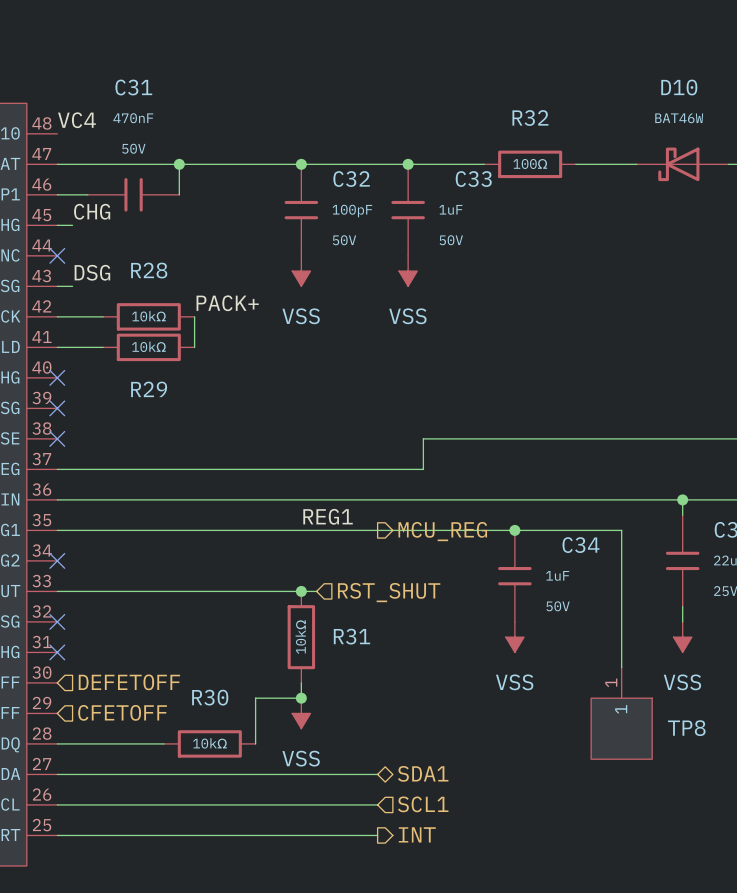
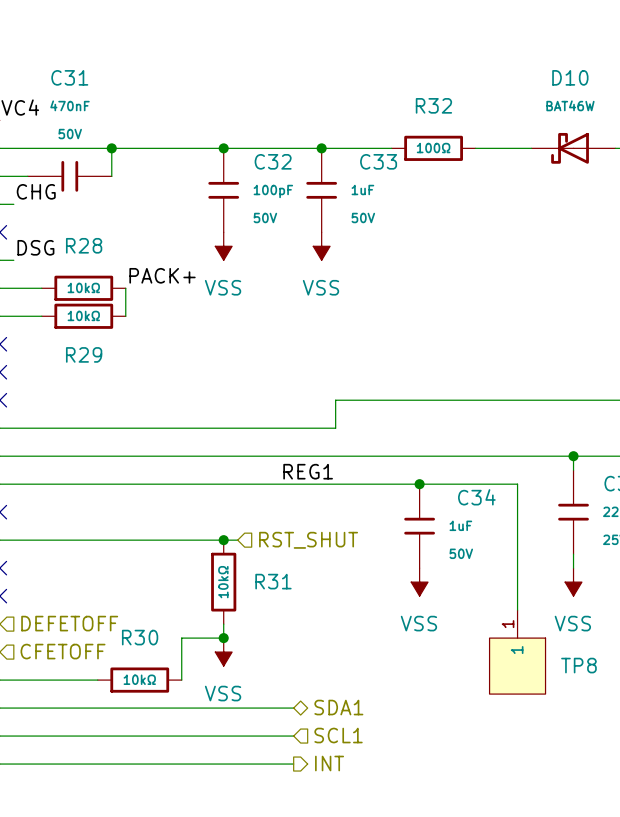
label position: REG1 (328, 516) -> REG1 (308, 471)
hierarchical label: MCU_REG (442, 531) -> none

